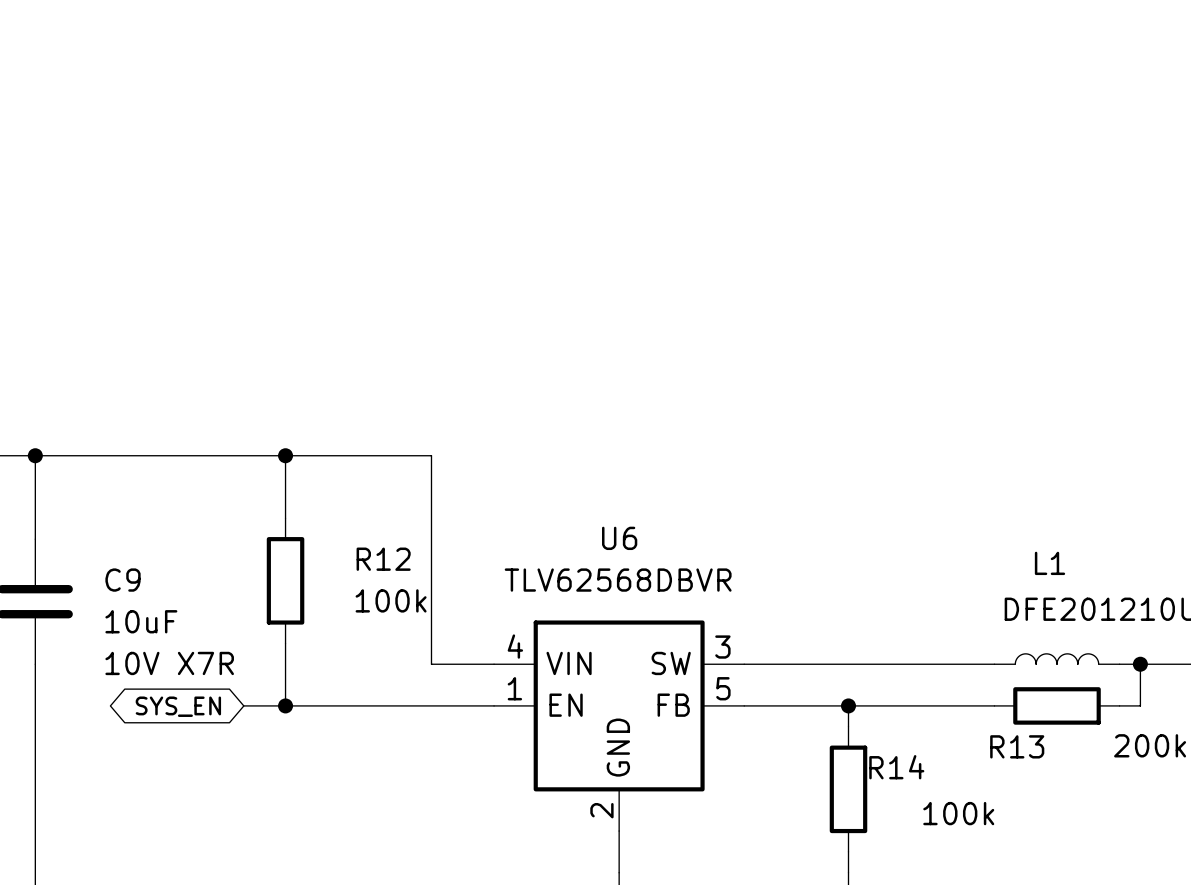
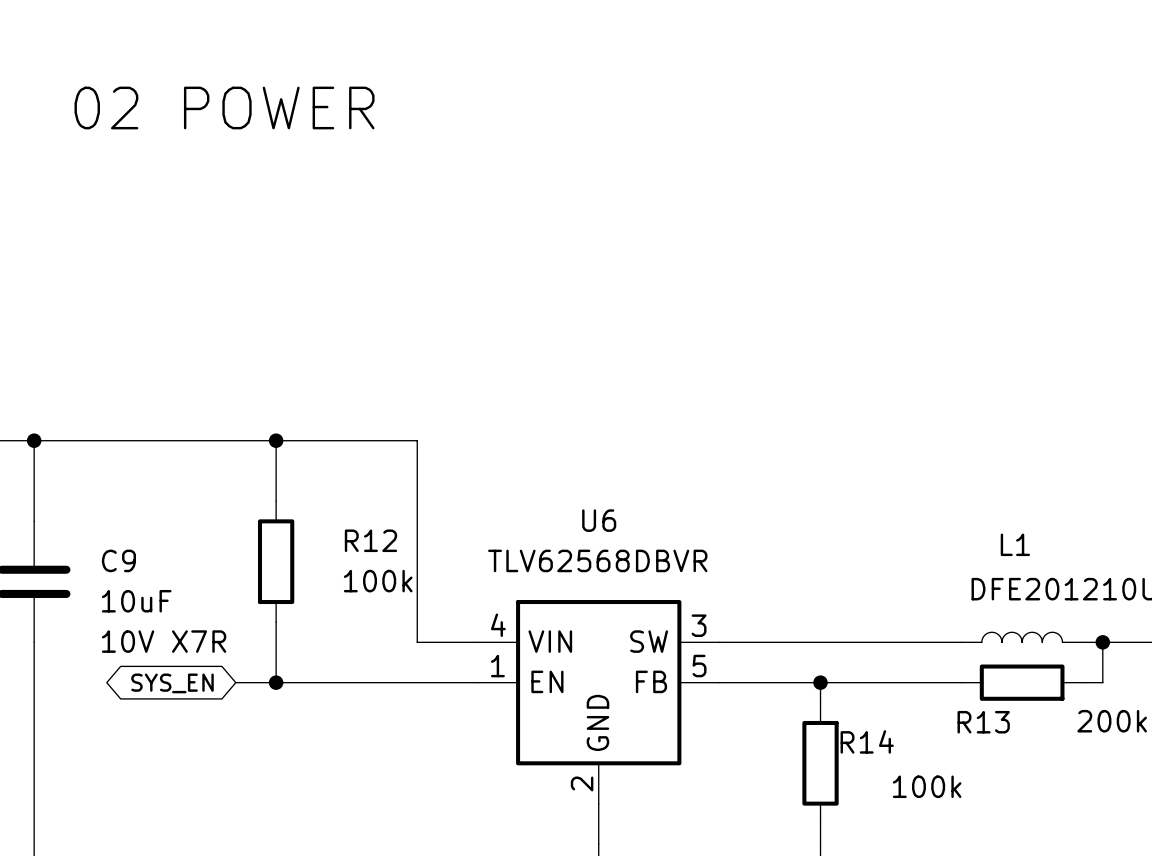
text: none -> 02 POWER (224, 107)

